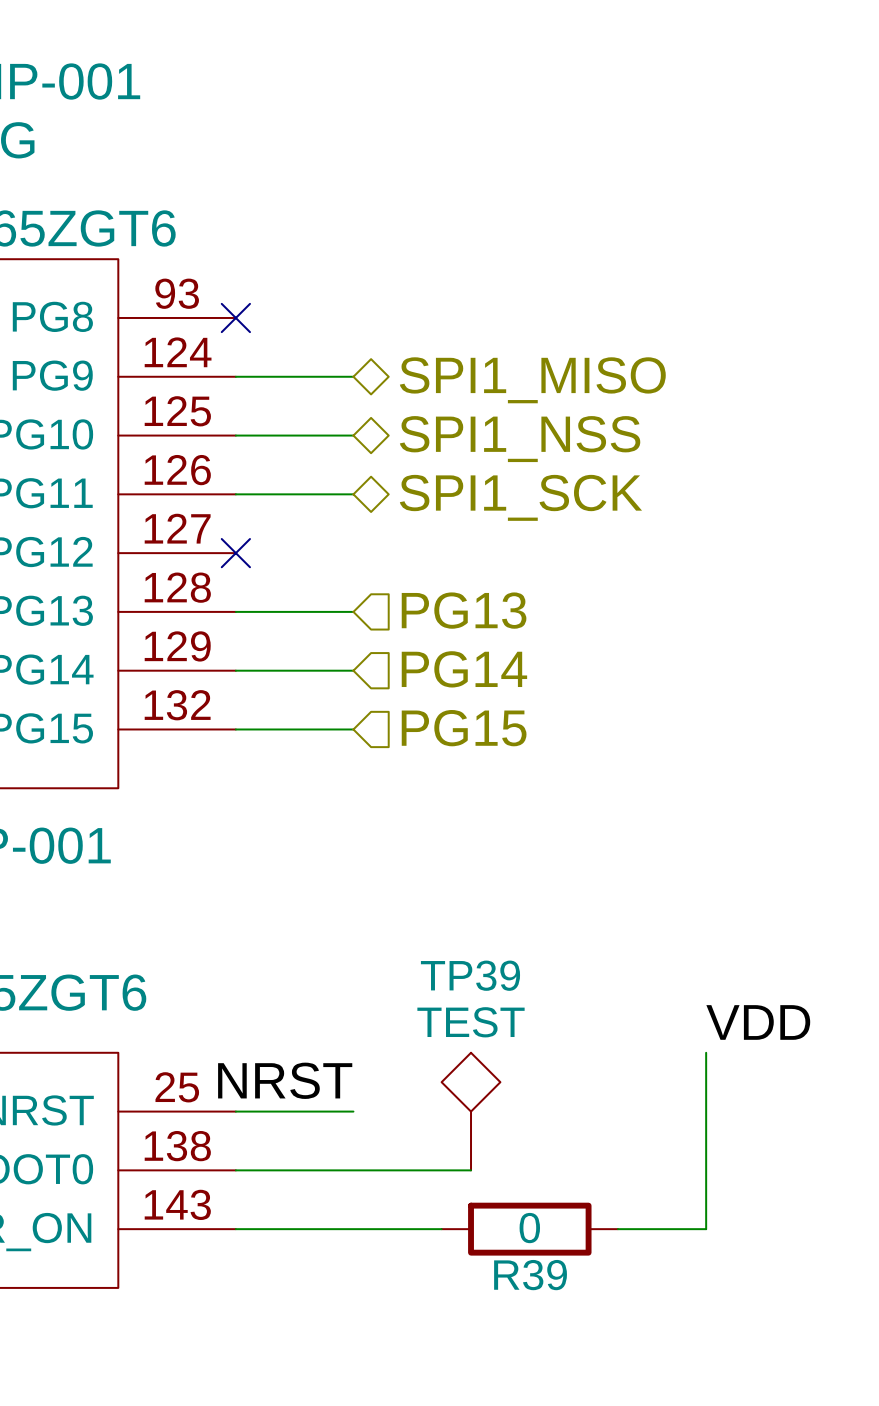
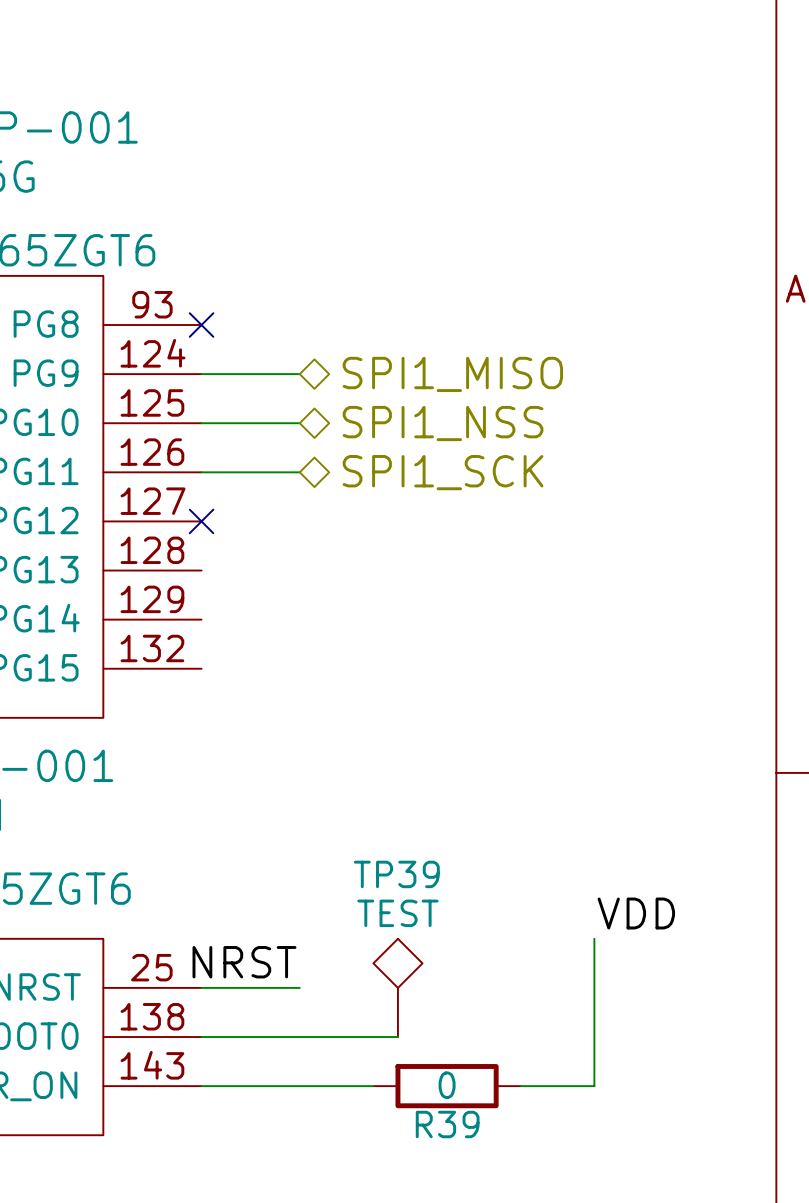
hierarchical label: PG13 (464, 610) -> none
wire: (235, 611) (353, 611) -> none
hierarchical label: PG14 (464, 669) -> none
wire: (235, 670) (353, 670) -> none
hierarchical label: PG15 (464, 728) -> none
wire: (235, 729) (353, 729) -> none

